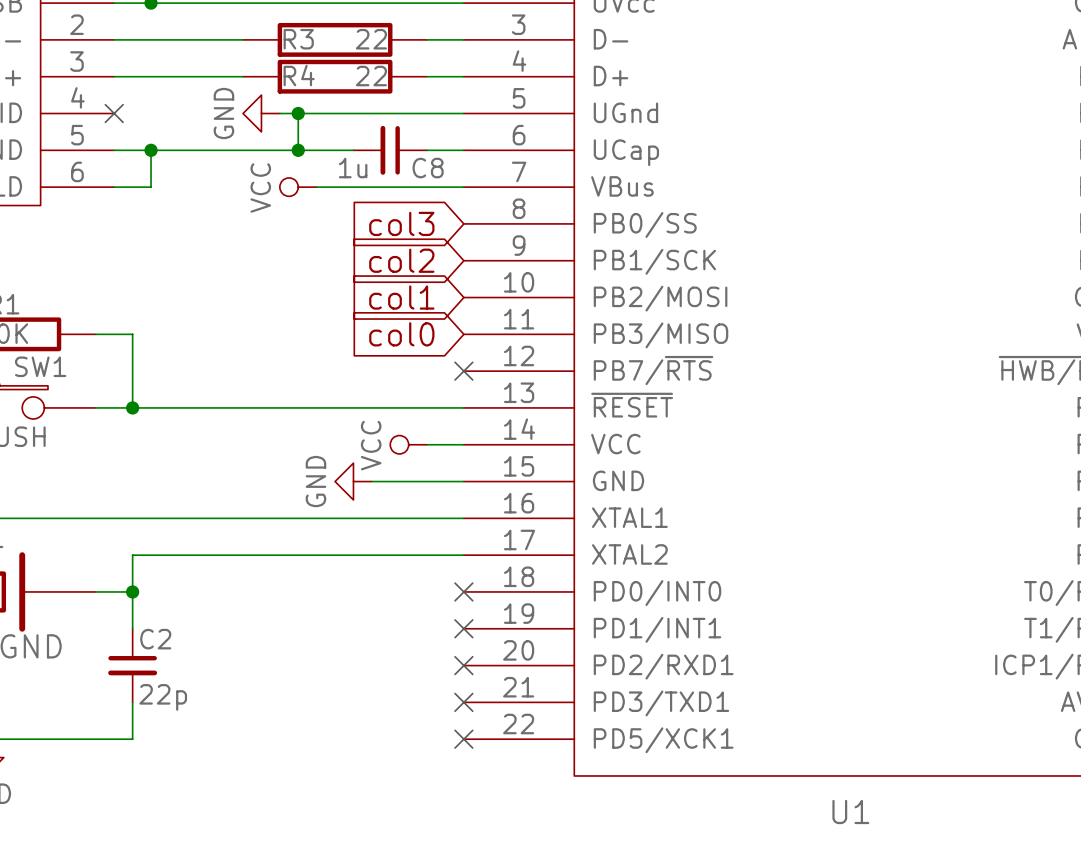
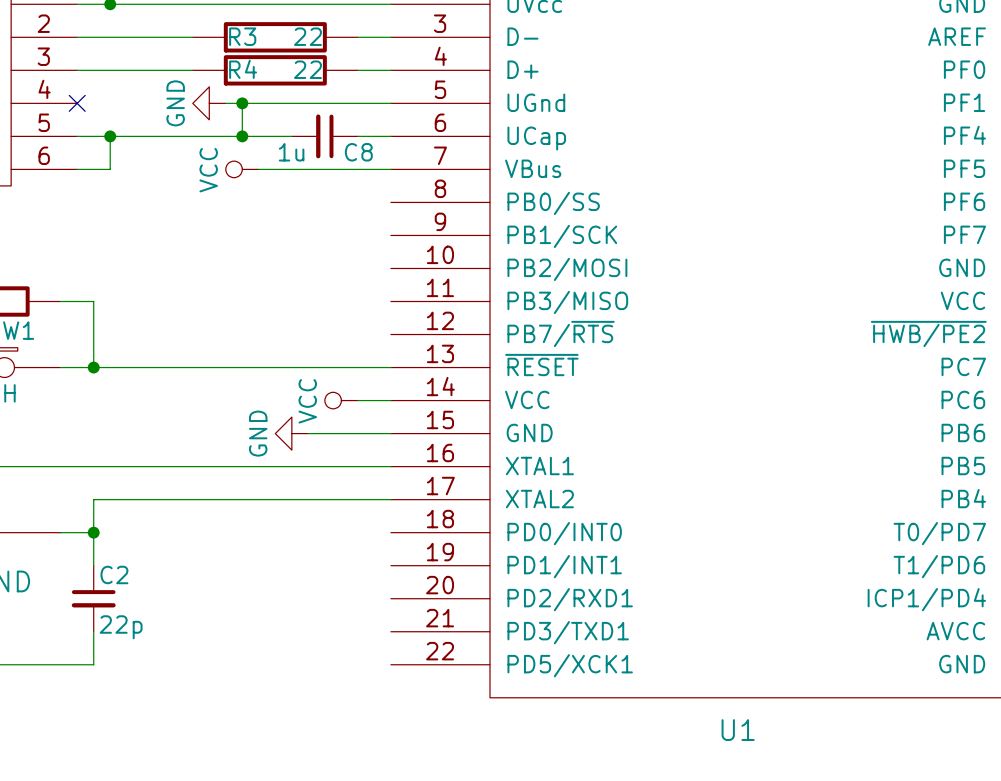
global label: col3 (401, 223) -> none
global label: col2 (401, 260) -> none
global label: col1 (401, 297) -> none
global label: col0 (401, 334) -> none
no-connect mark: (463, 371) -> none
no-connect mark: (463, 591) -> none
no-connect mark: (463, 628) -> none
no-connect mark: (463, 665) -> none
no-connect mark: (463, 702) -> none
no-connect mark: (463, 739) -> none

